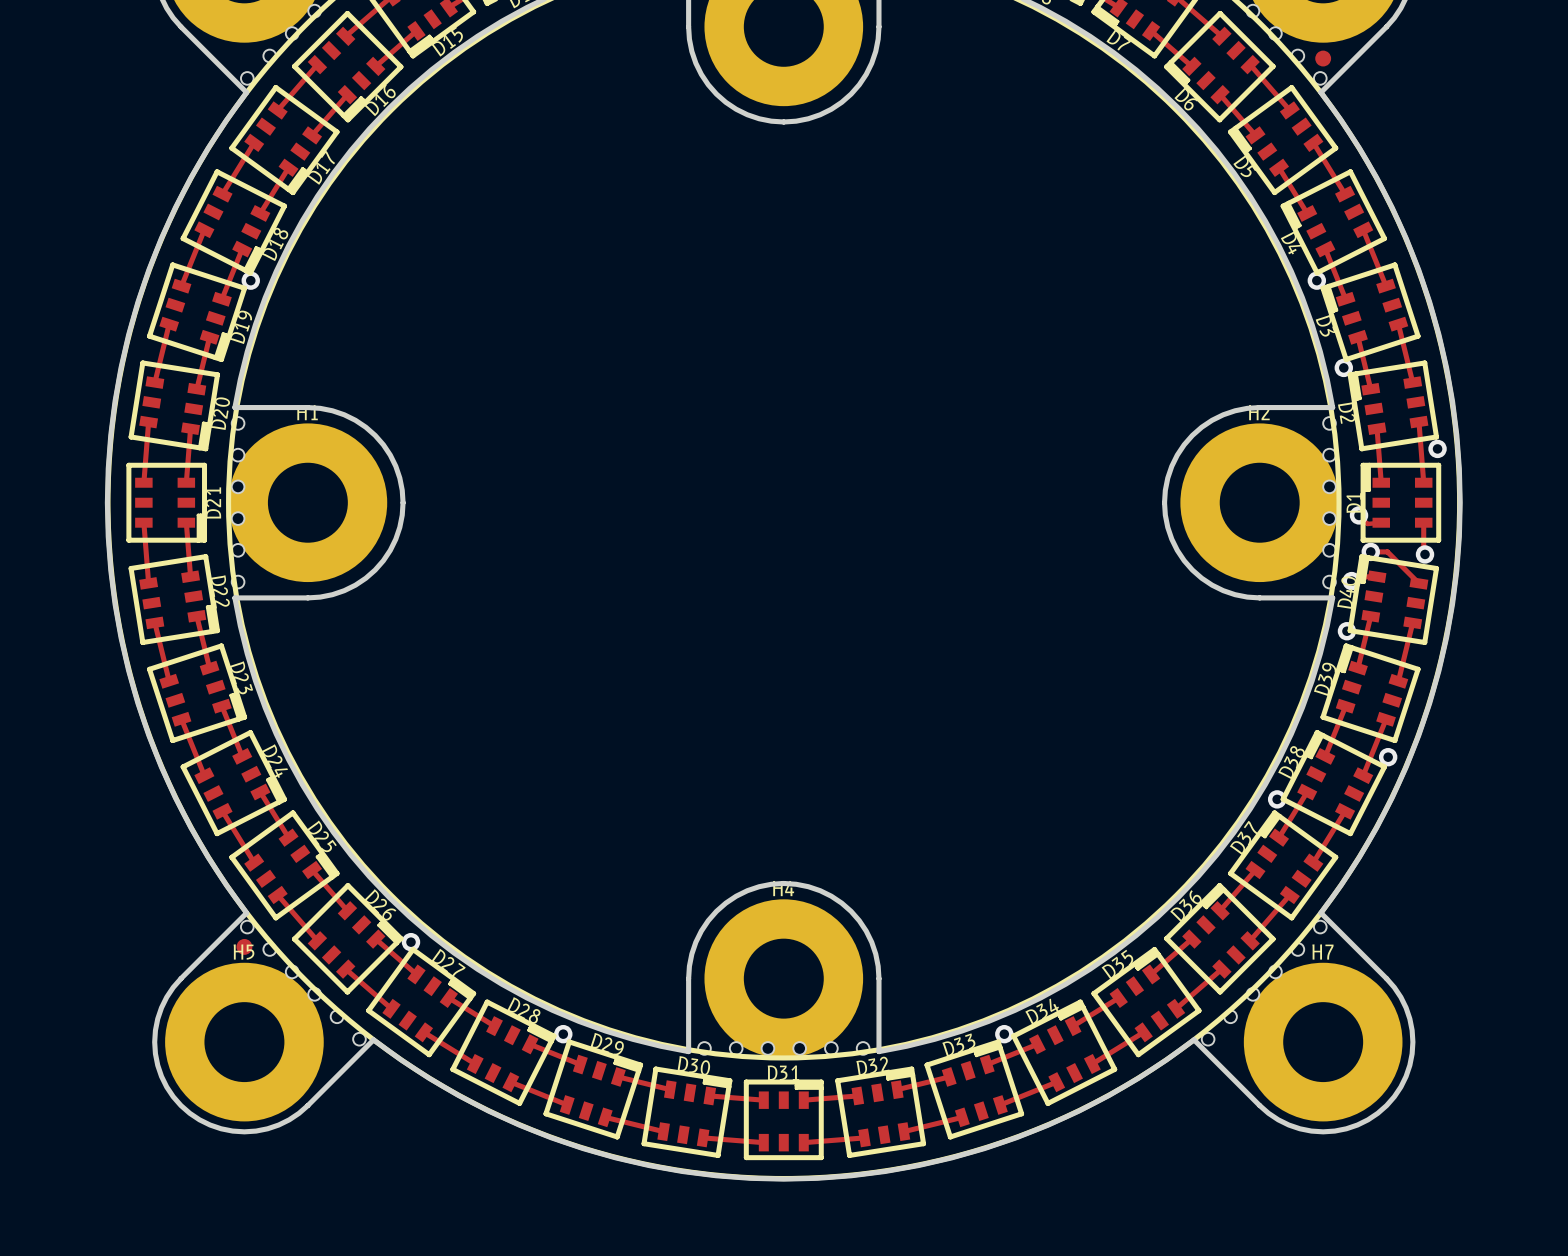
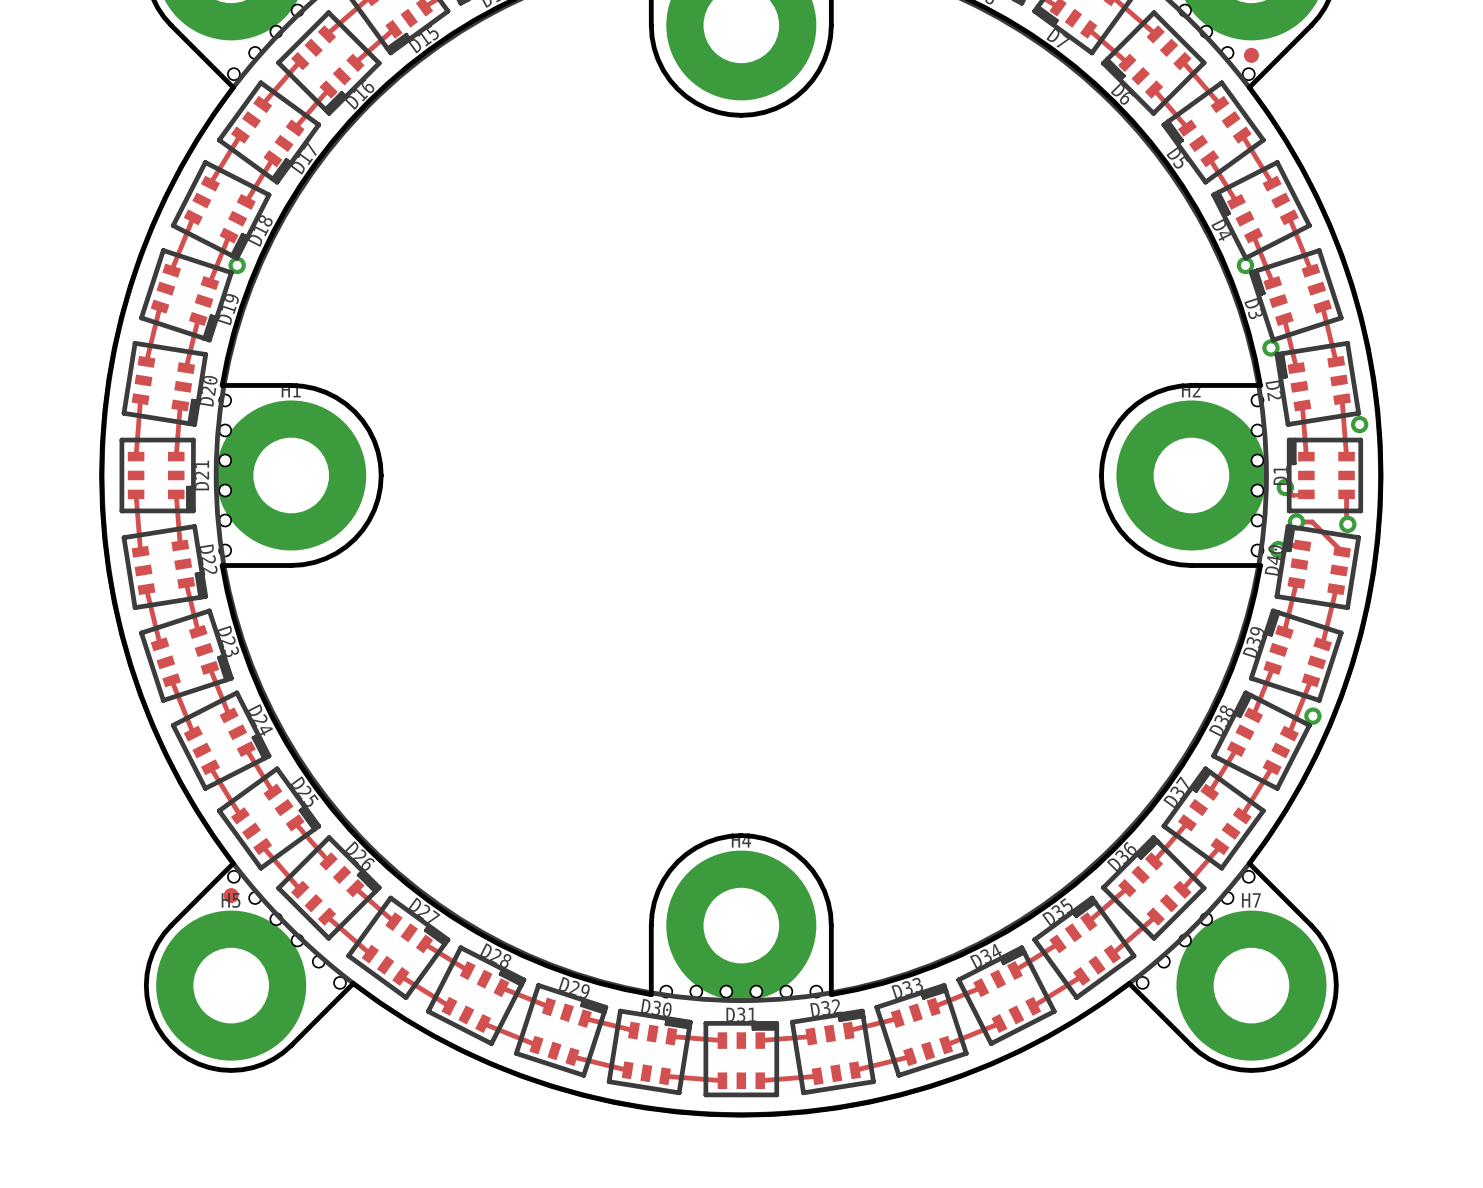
via: (1346, 631) -> none
via: (1277, 799) -> none
via: (411, 942) -> none
via: (563, 1034) -> none
via: (1004, 1034) -> none

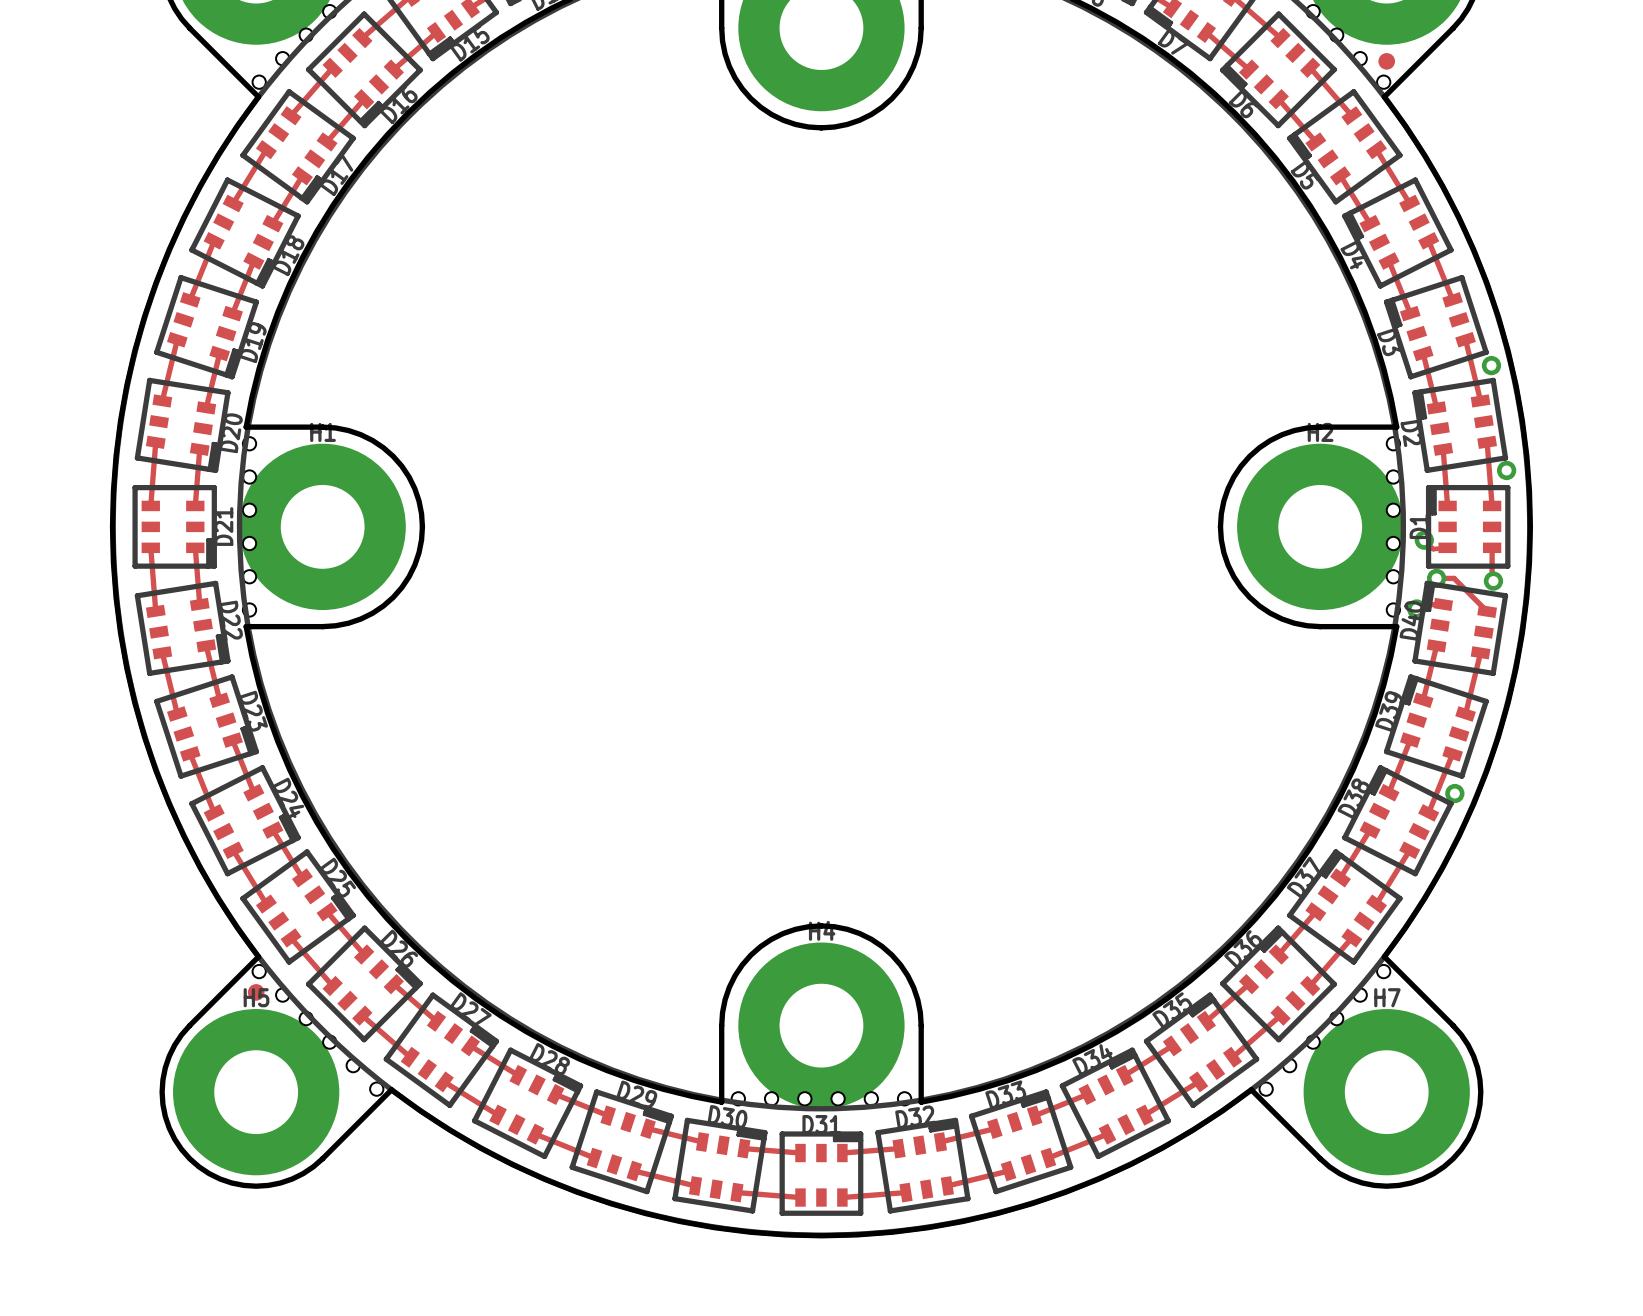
via: (237, 265) -> none
via: (1245, 265) -> none
via: none -> (1491, 365)
via: (1270, 347) -> none

